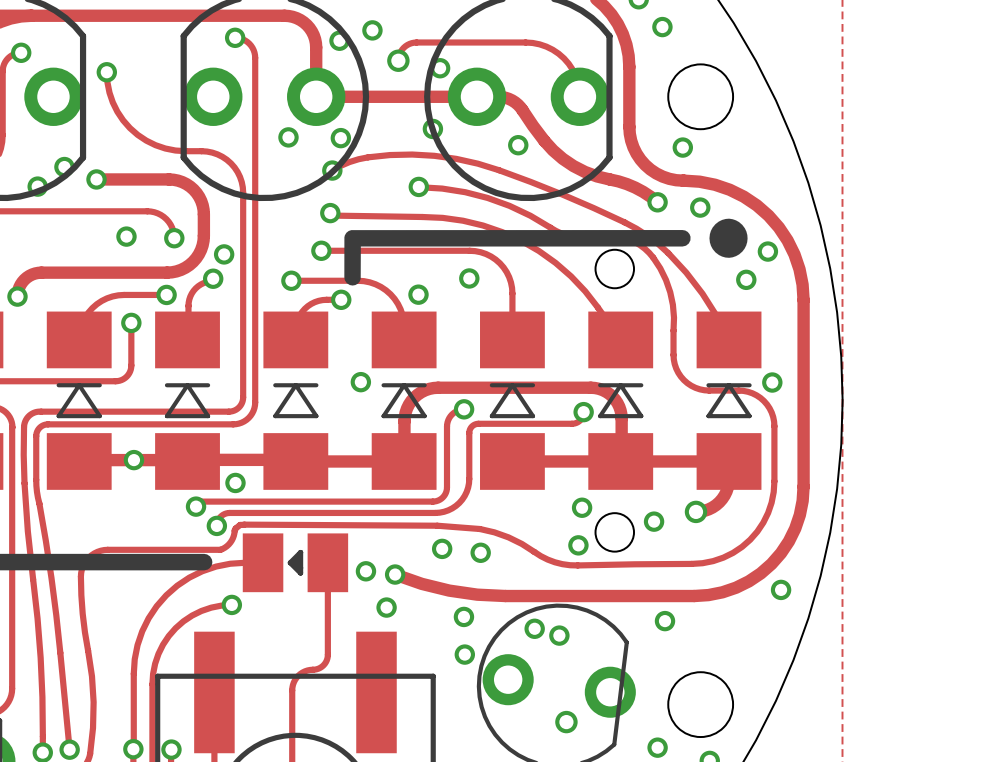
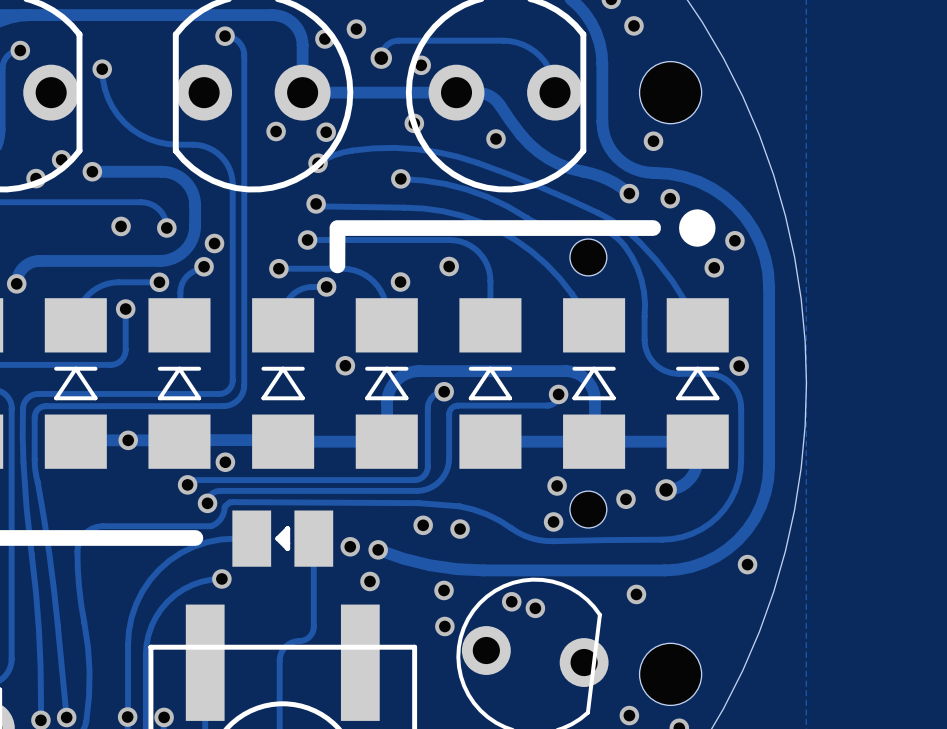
via: (566, 722) -> none

